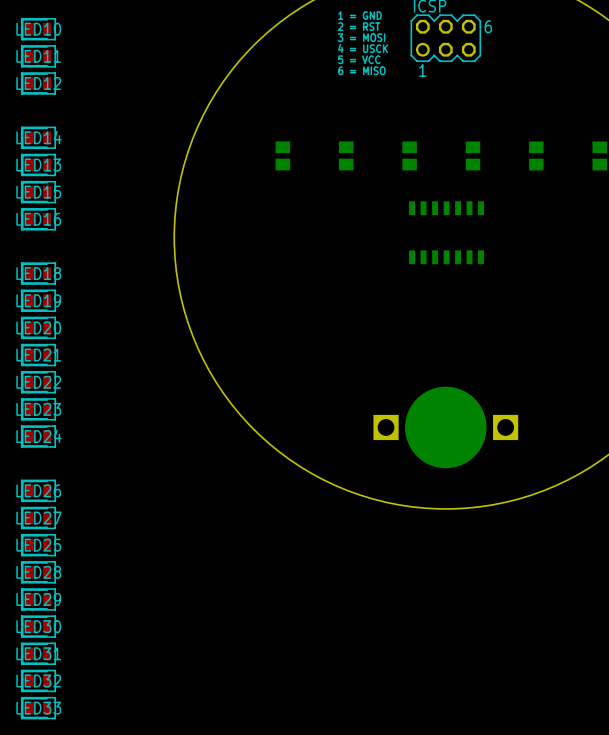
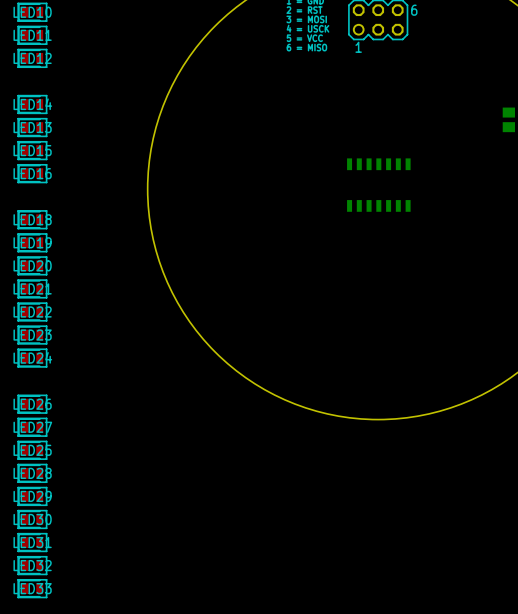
part: (282, 155) -> none
part: (346, 155) -> none
part: (409, 155) -> none
part: (472, 155) -> none
part: (536, 155) -> none
part: (445, 427) -> none

